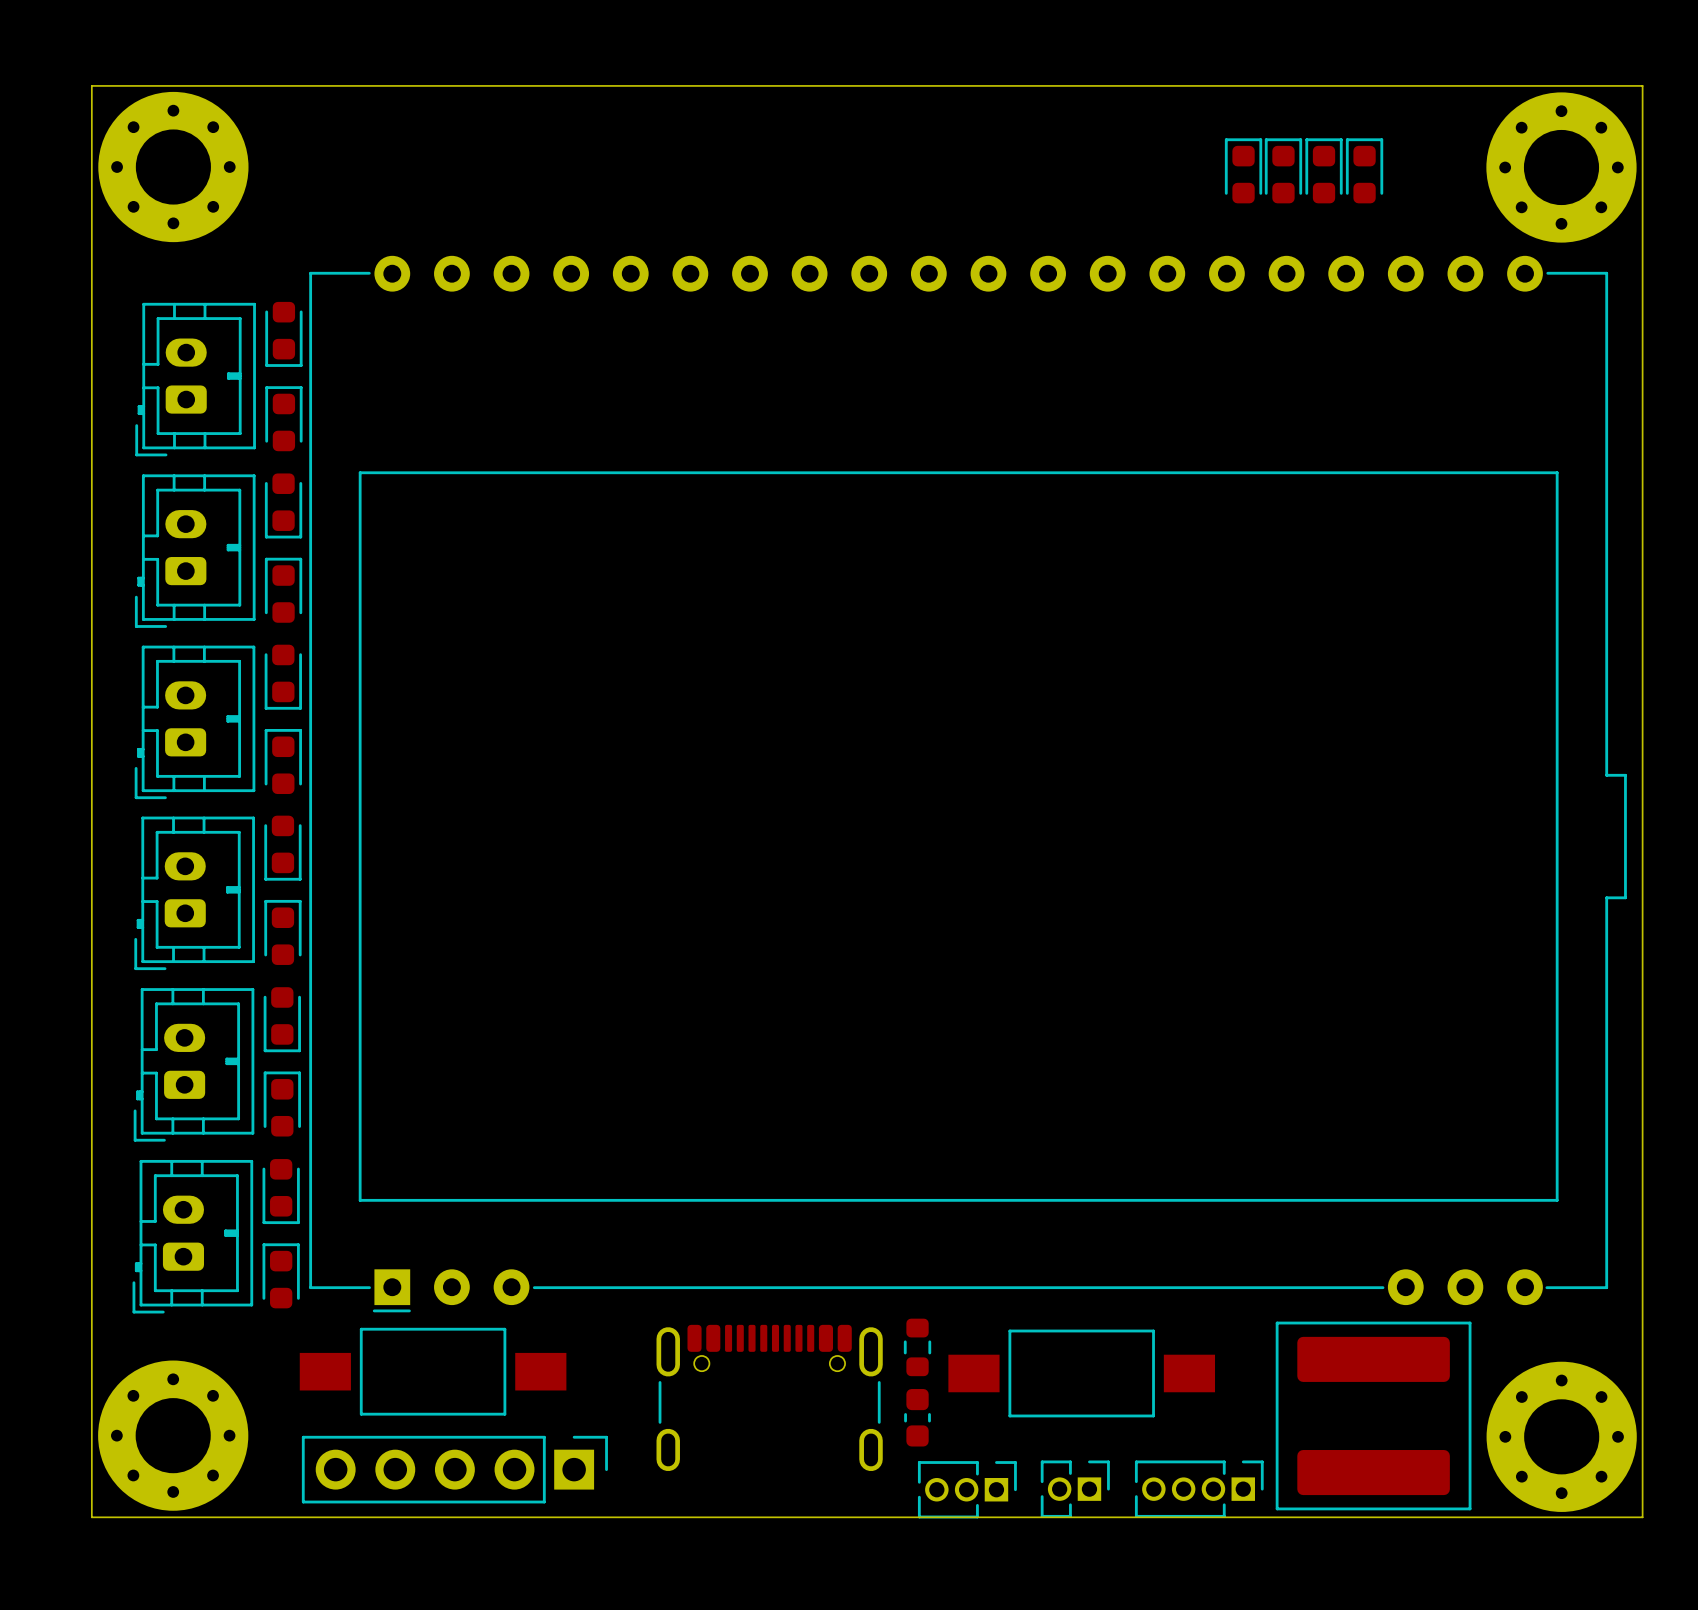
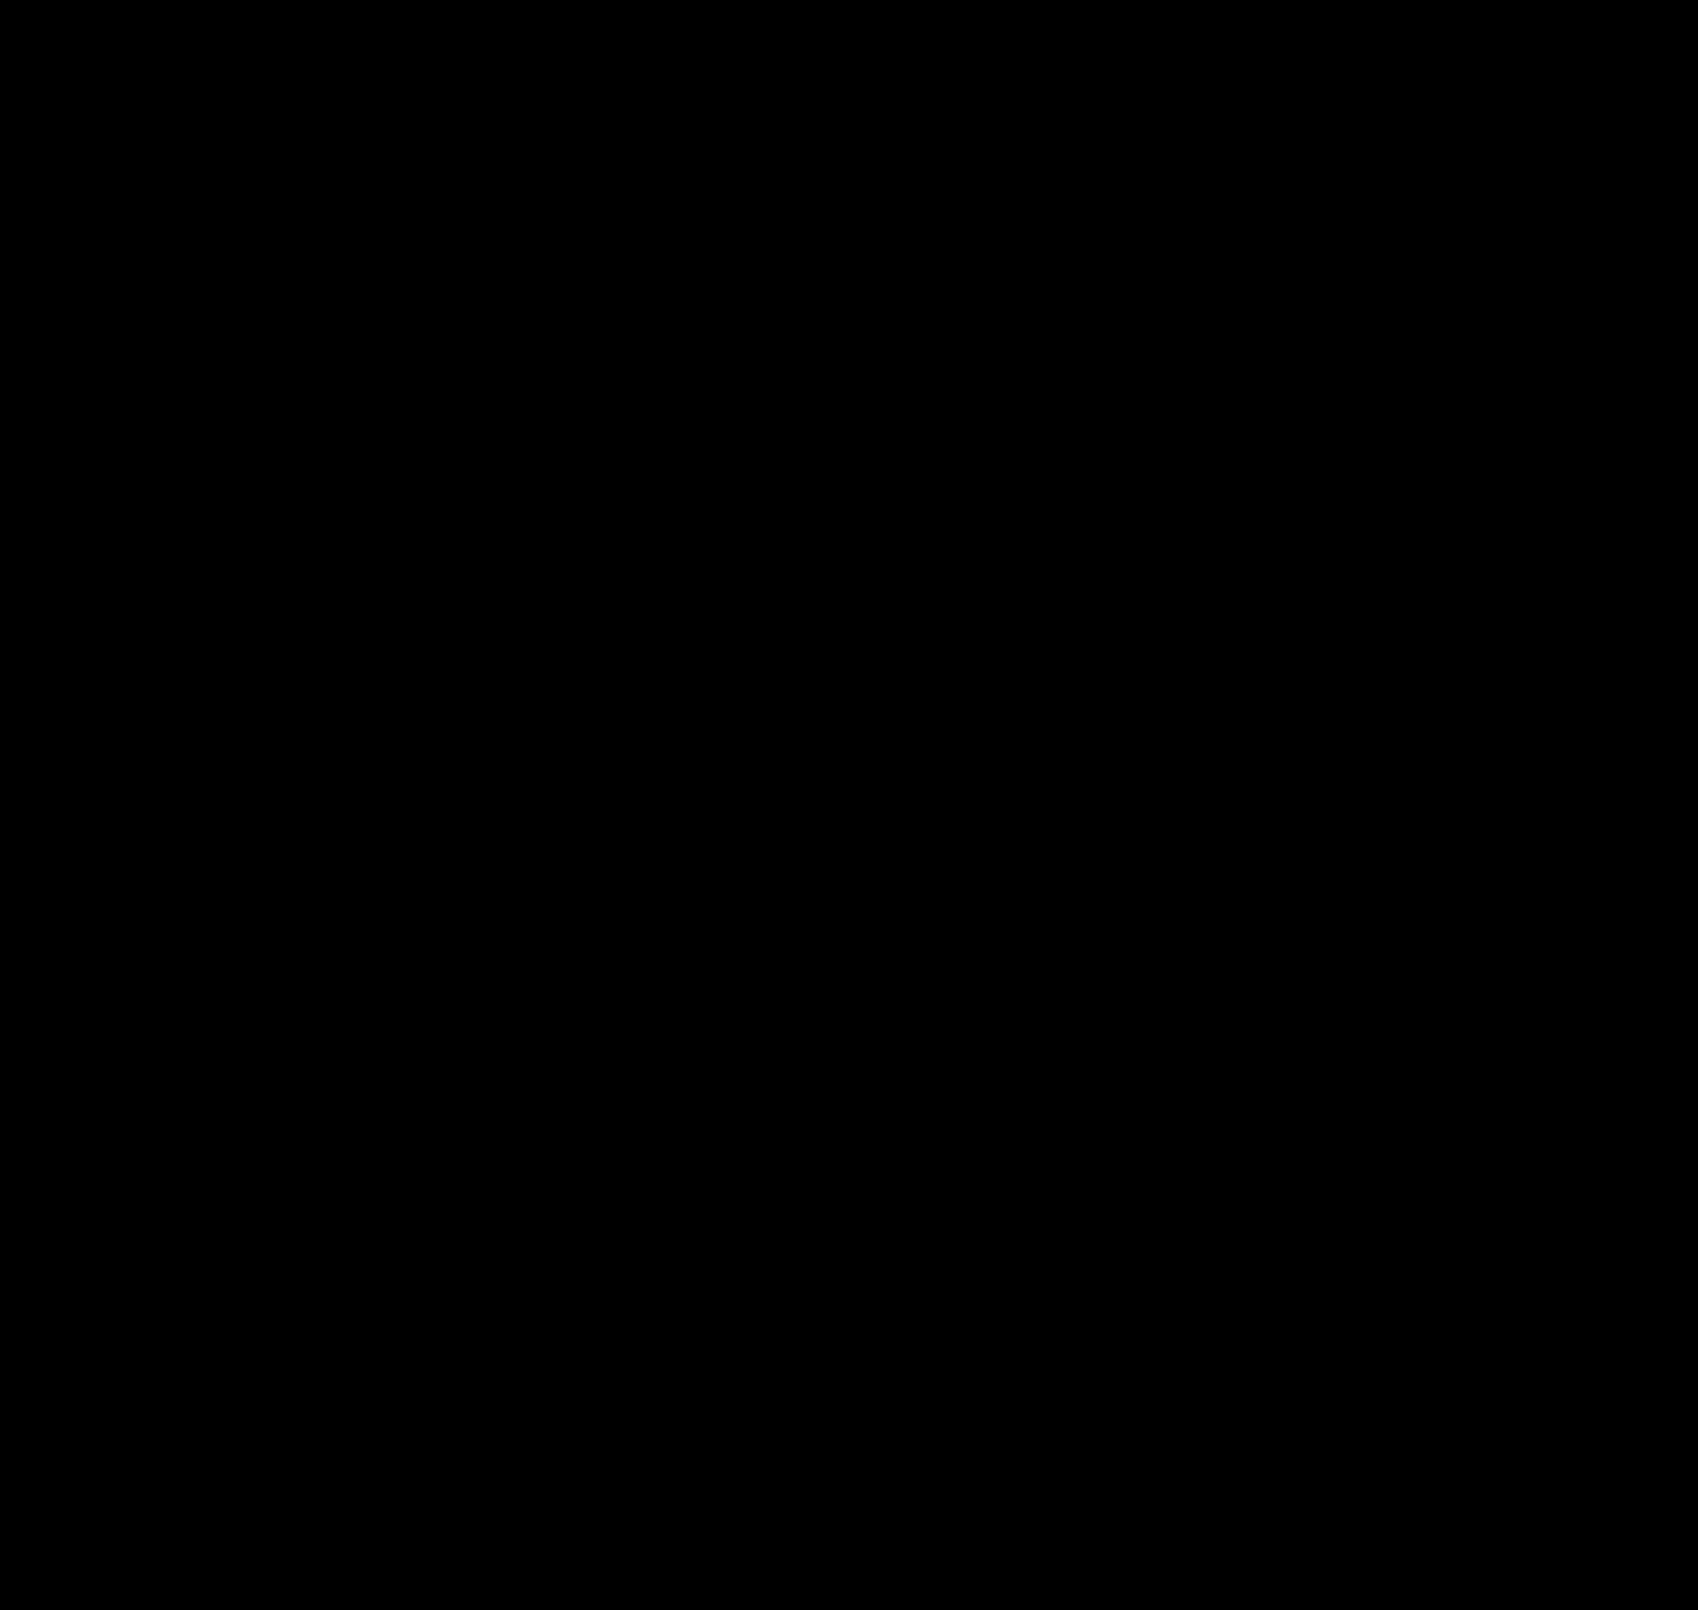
board edge: (91, 85) (1642, 85) (1642, 1517) (91, 1517) (91, 85) -> none
part: (173, 167) -> none
part: (1561, 167) -> none
part: (1243, 170) -> none
part: (1283, 170) -> none
part: (1324, 170) -> none
part: (1364, 170) -> none
part: (283, 334) -> none
part: (195, 379) -> none
part: (283, 418) -> none
part: (283, 505) -> none
part: (195, 551) -> none
part: (283, 590) -> none
part: (283, 677) -> none
part: (195, 722) -> none
part: (283, 761) -> none
part: (968, 784) -> none
part: (282, 848) -> none
part: (194, 893) -> none
part: (282, 932) -> none
part: (282, 1019) -> none
part: (194, 1064) -> none
part: (282, 1104) -> none
part: (281, 1191) -> none
part: (192, 1236) -> none
part: (281, 1275) -> none
part: (917, 1347) -> none
part: (433, 1371) -> none
part: (1081, 1373) -> none
part: (769, 1397) -> none
part: (1373, 1415) -> none
part: (917, 1417) -> none
part: (173, 1435) -> none
part: (1561, 1436) -> none
part: (454, 1469) -> none
part: (967, 1489) -> none
part: (1075, 1489) -> none
part: (1199, 1489) -> none

